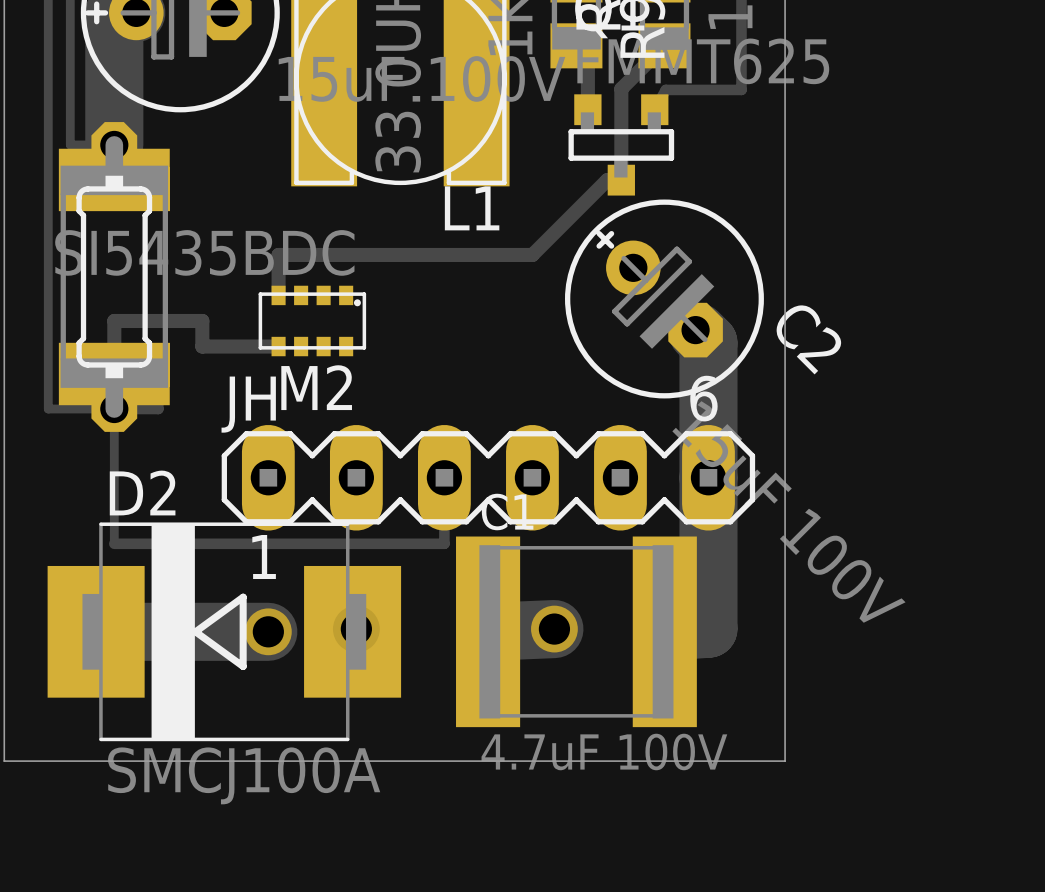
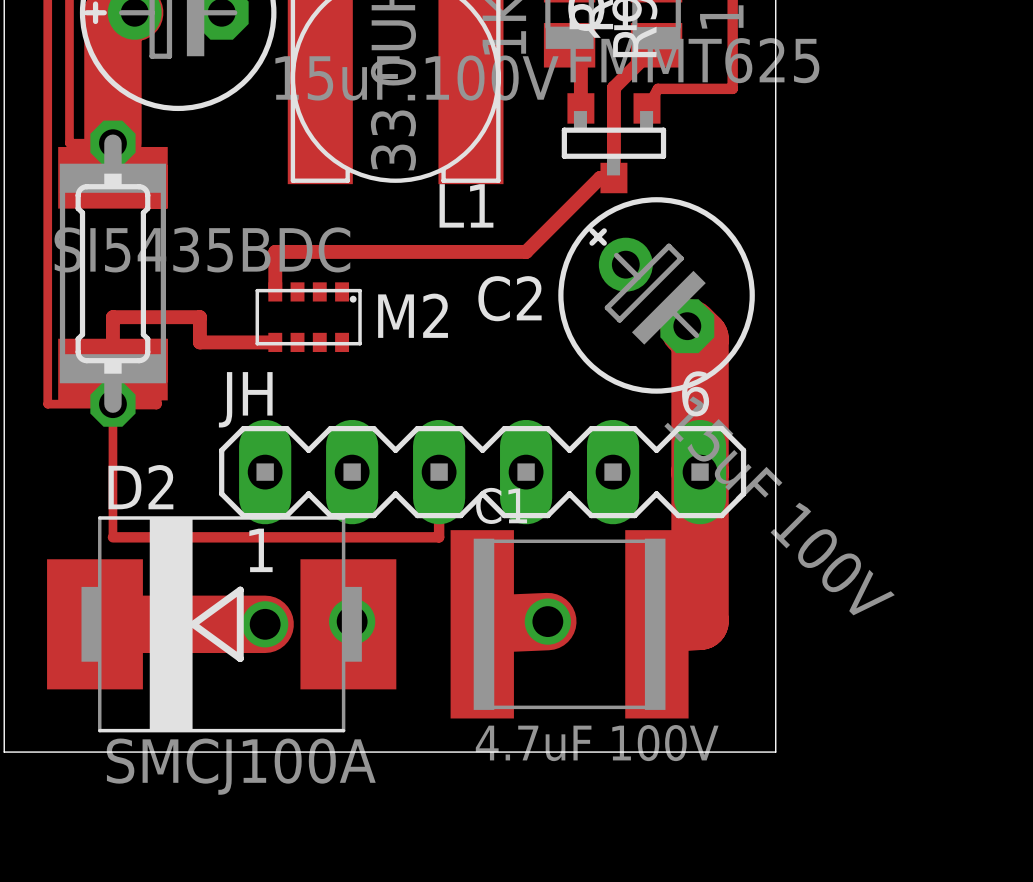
C2 name rotation: 0° (808, 339) -> 45° counterclockwise (510, 298)
C2 name position: C2 (808, 339) -> C2 (510, 298)
M2 name position: M2 (316, 387) -> M2 (413, 315)

